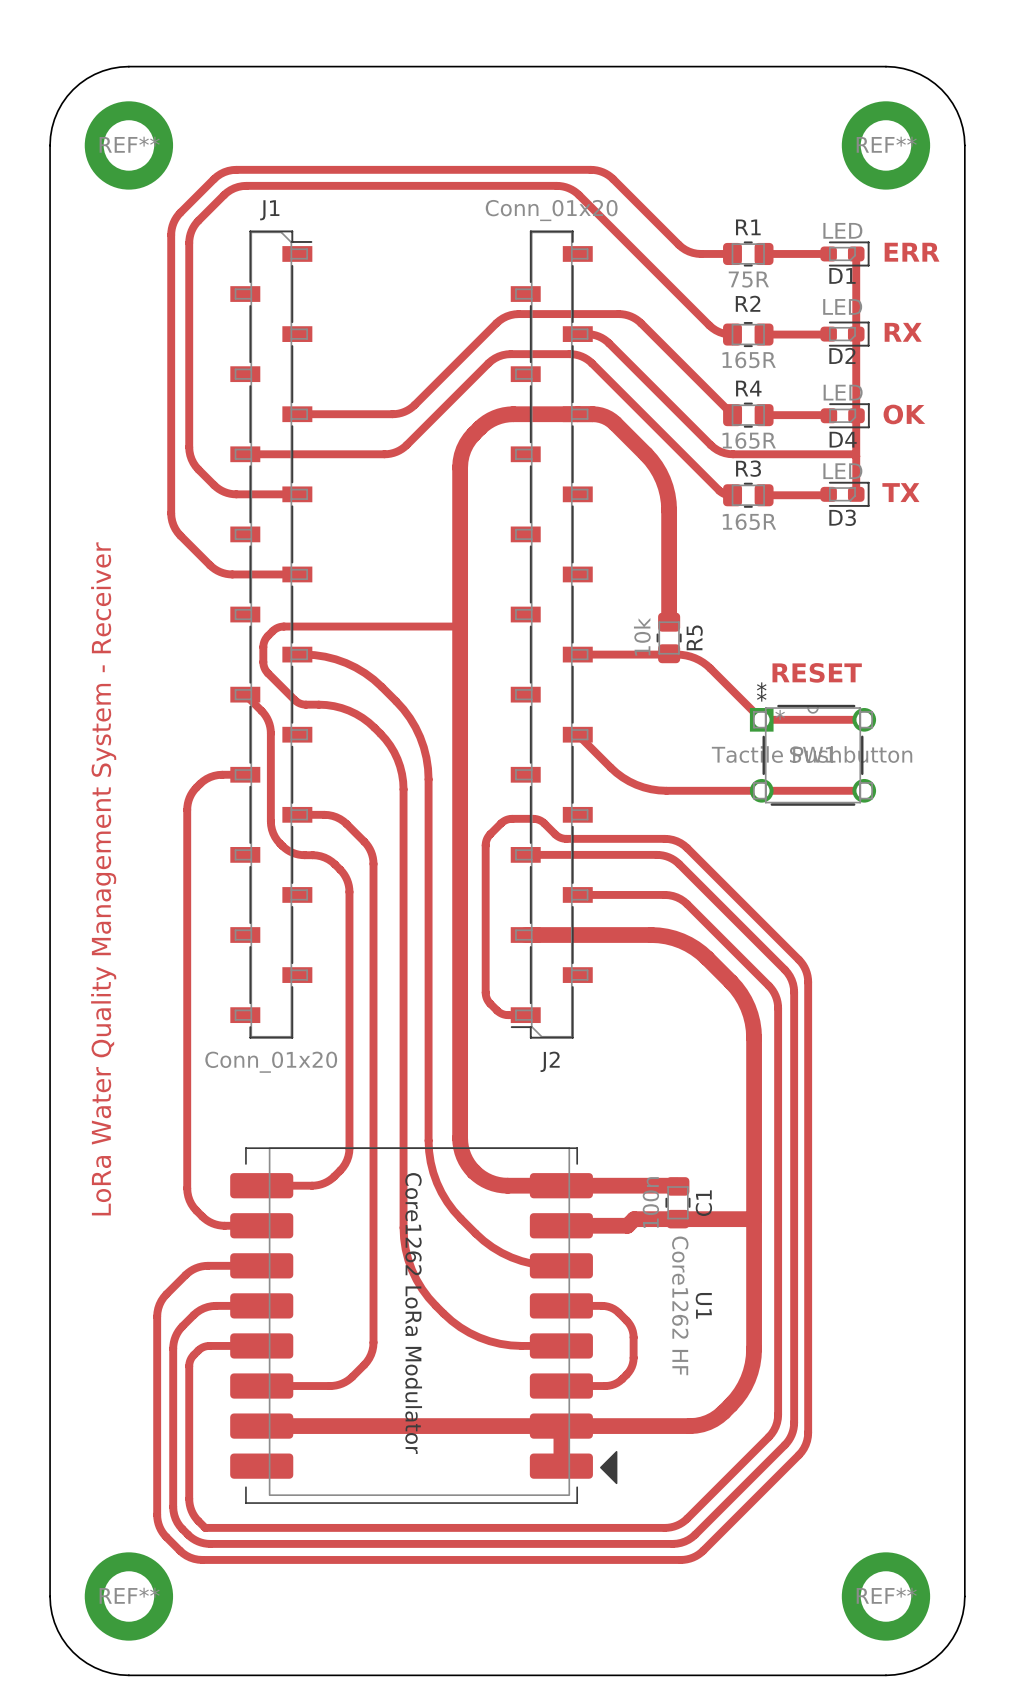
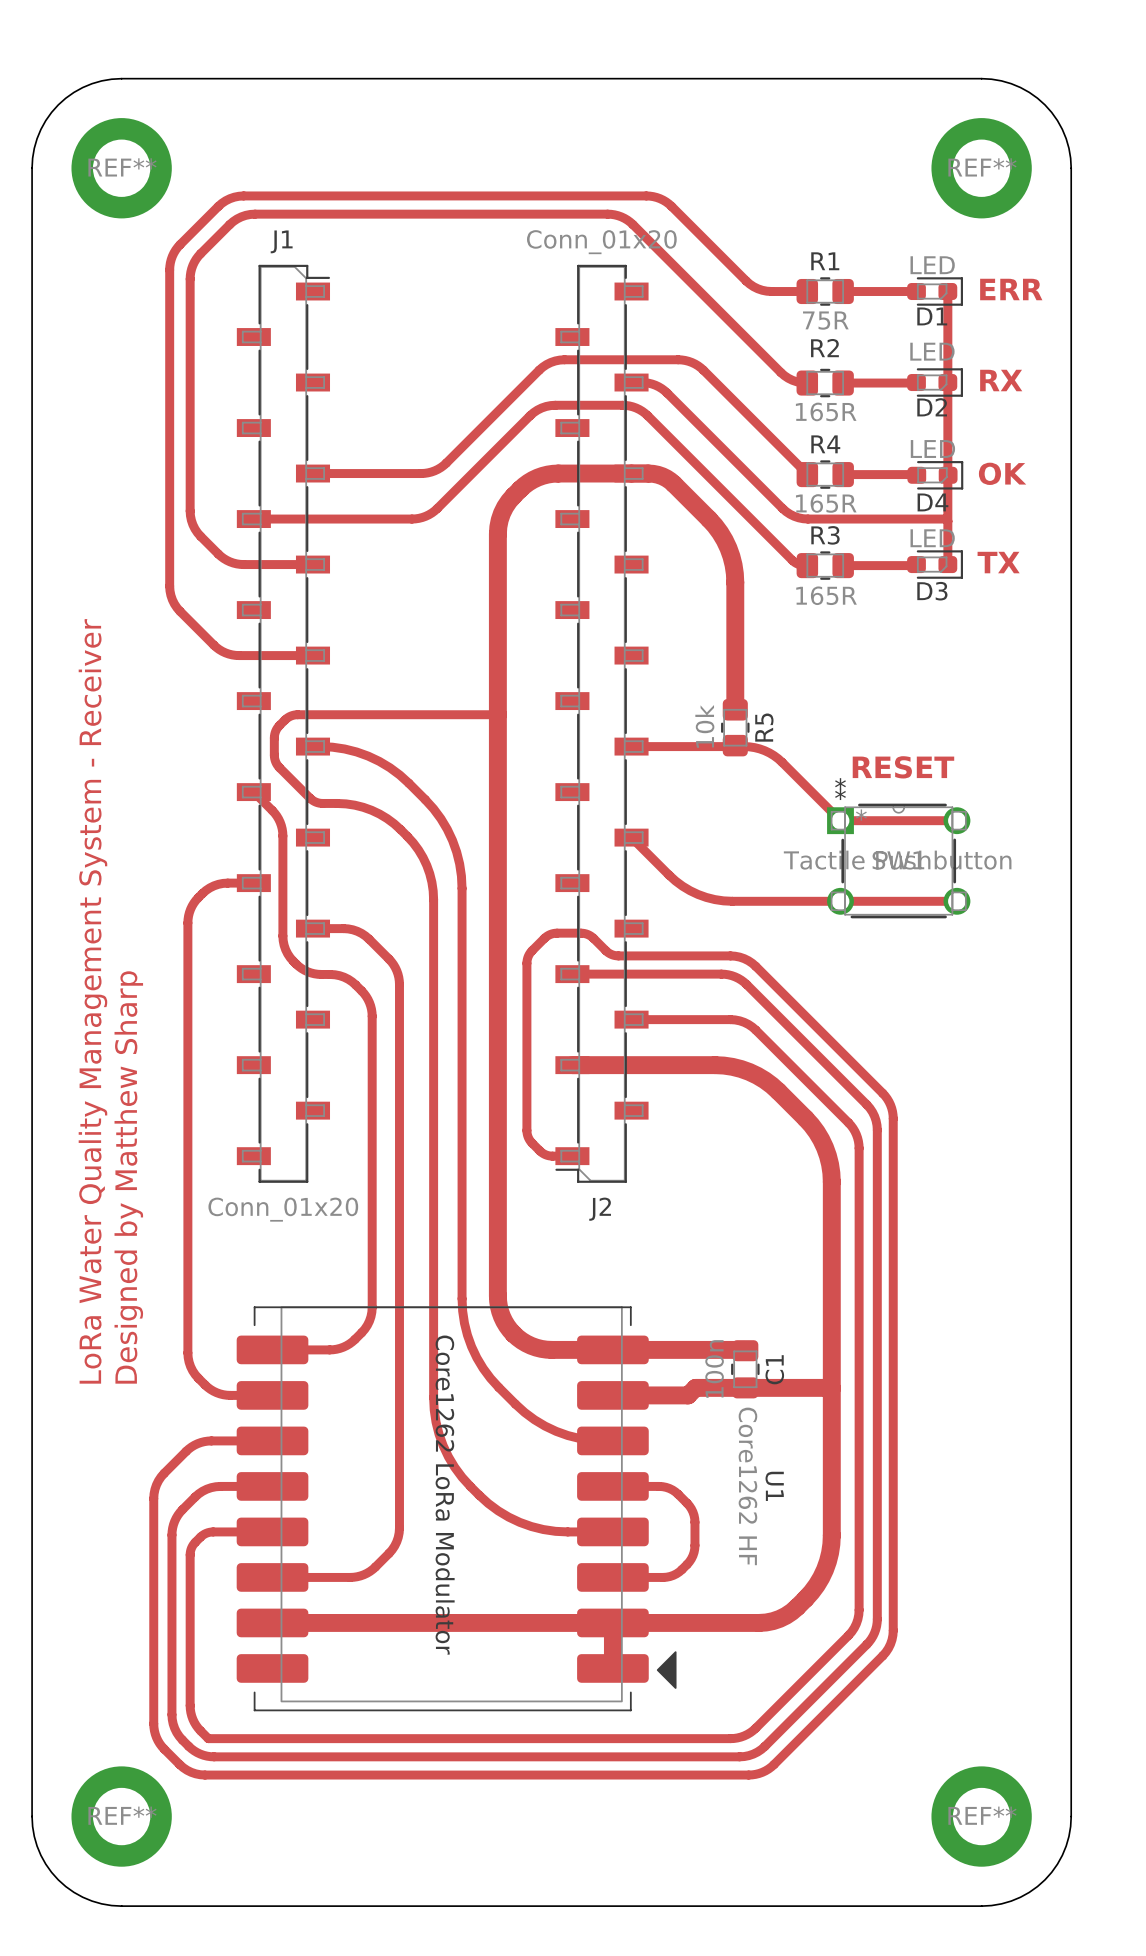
text: none -> Designed by Matthew Sharp (128, 1177)

